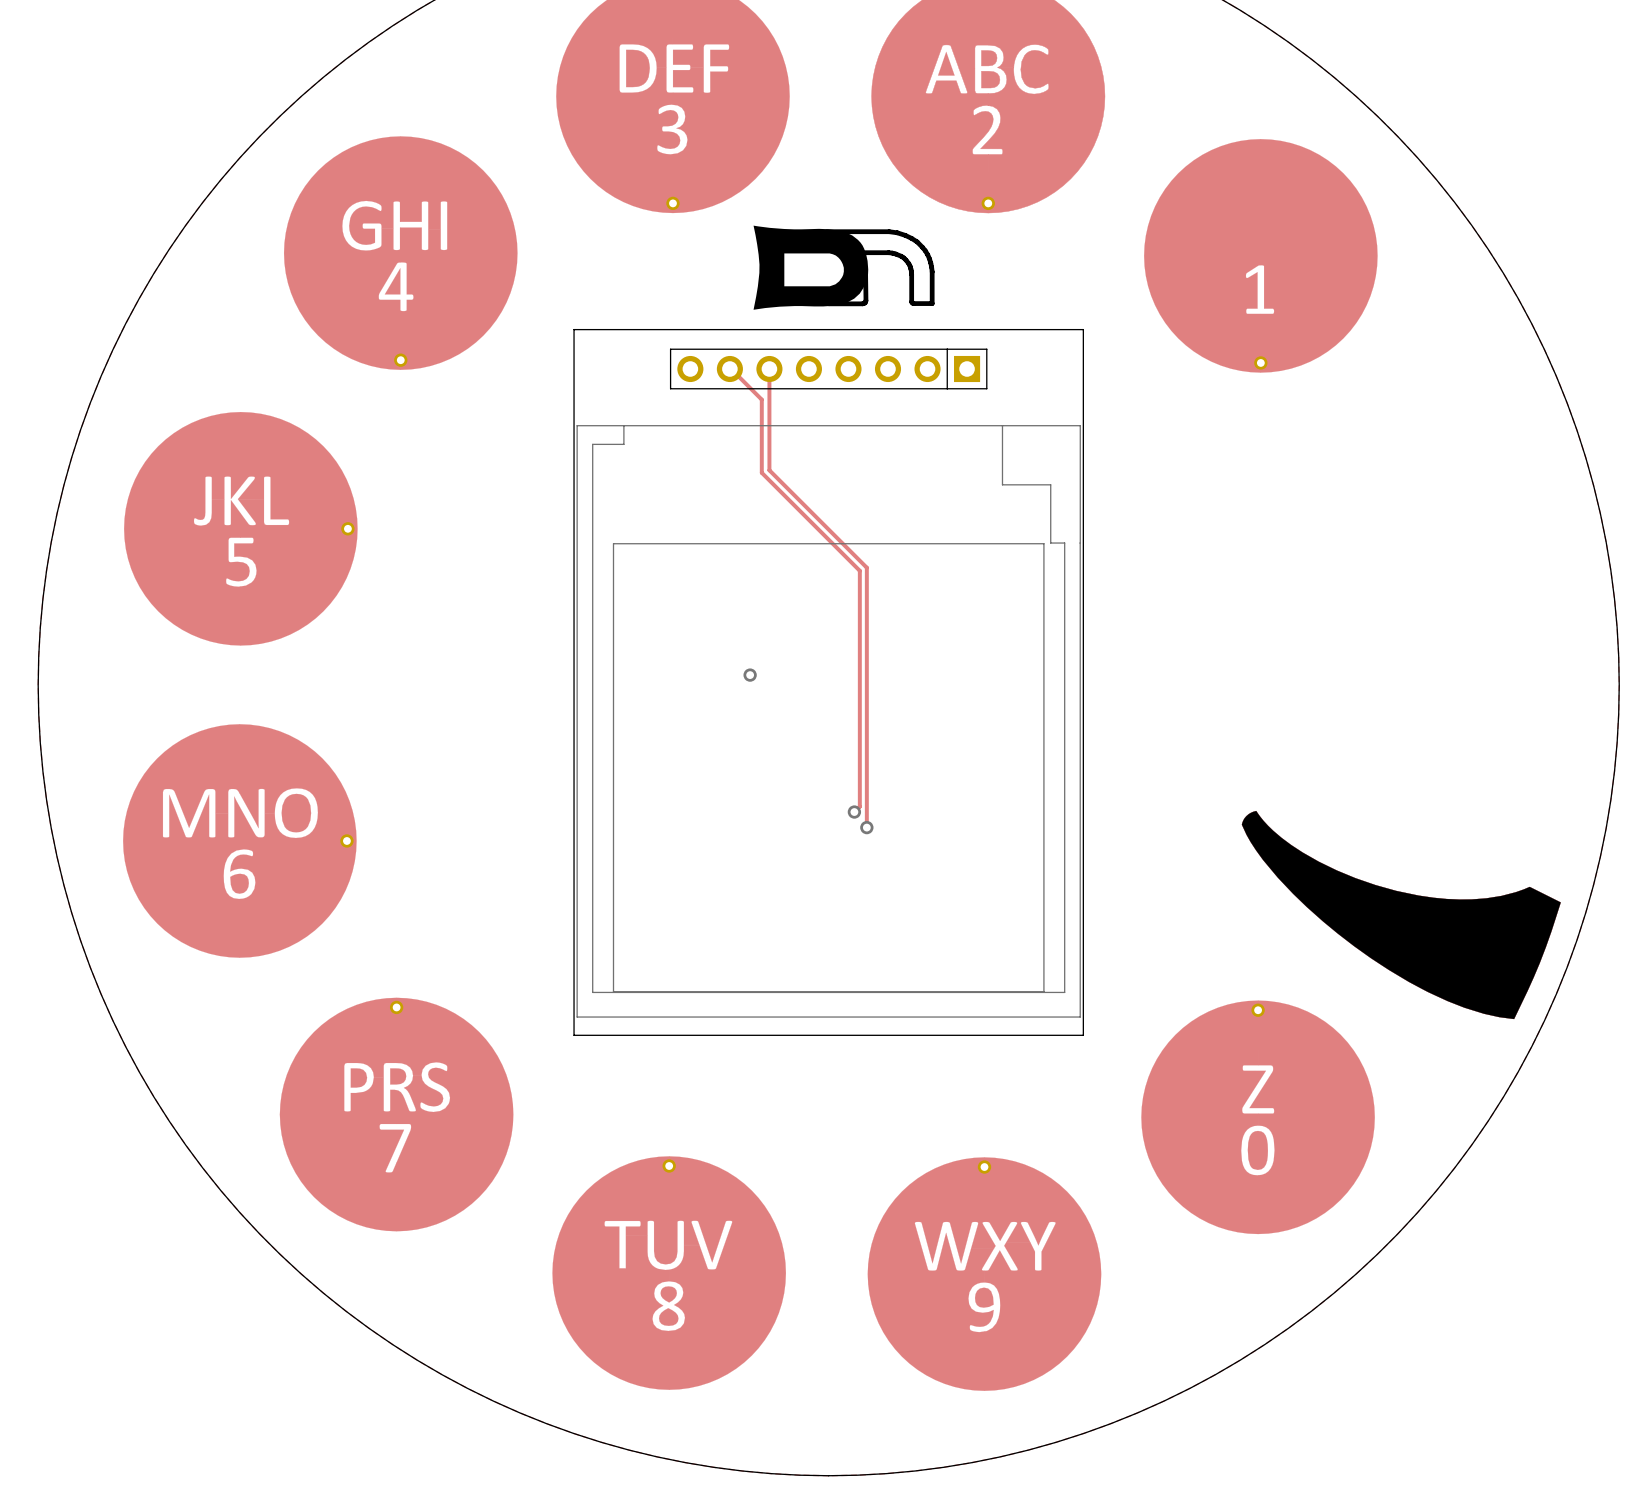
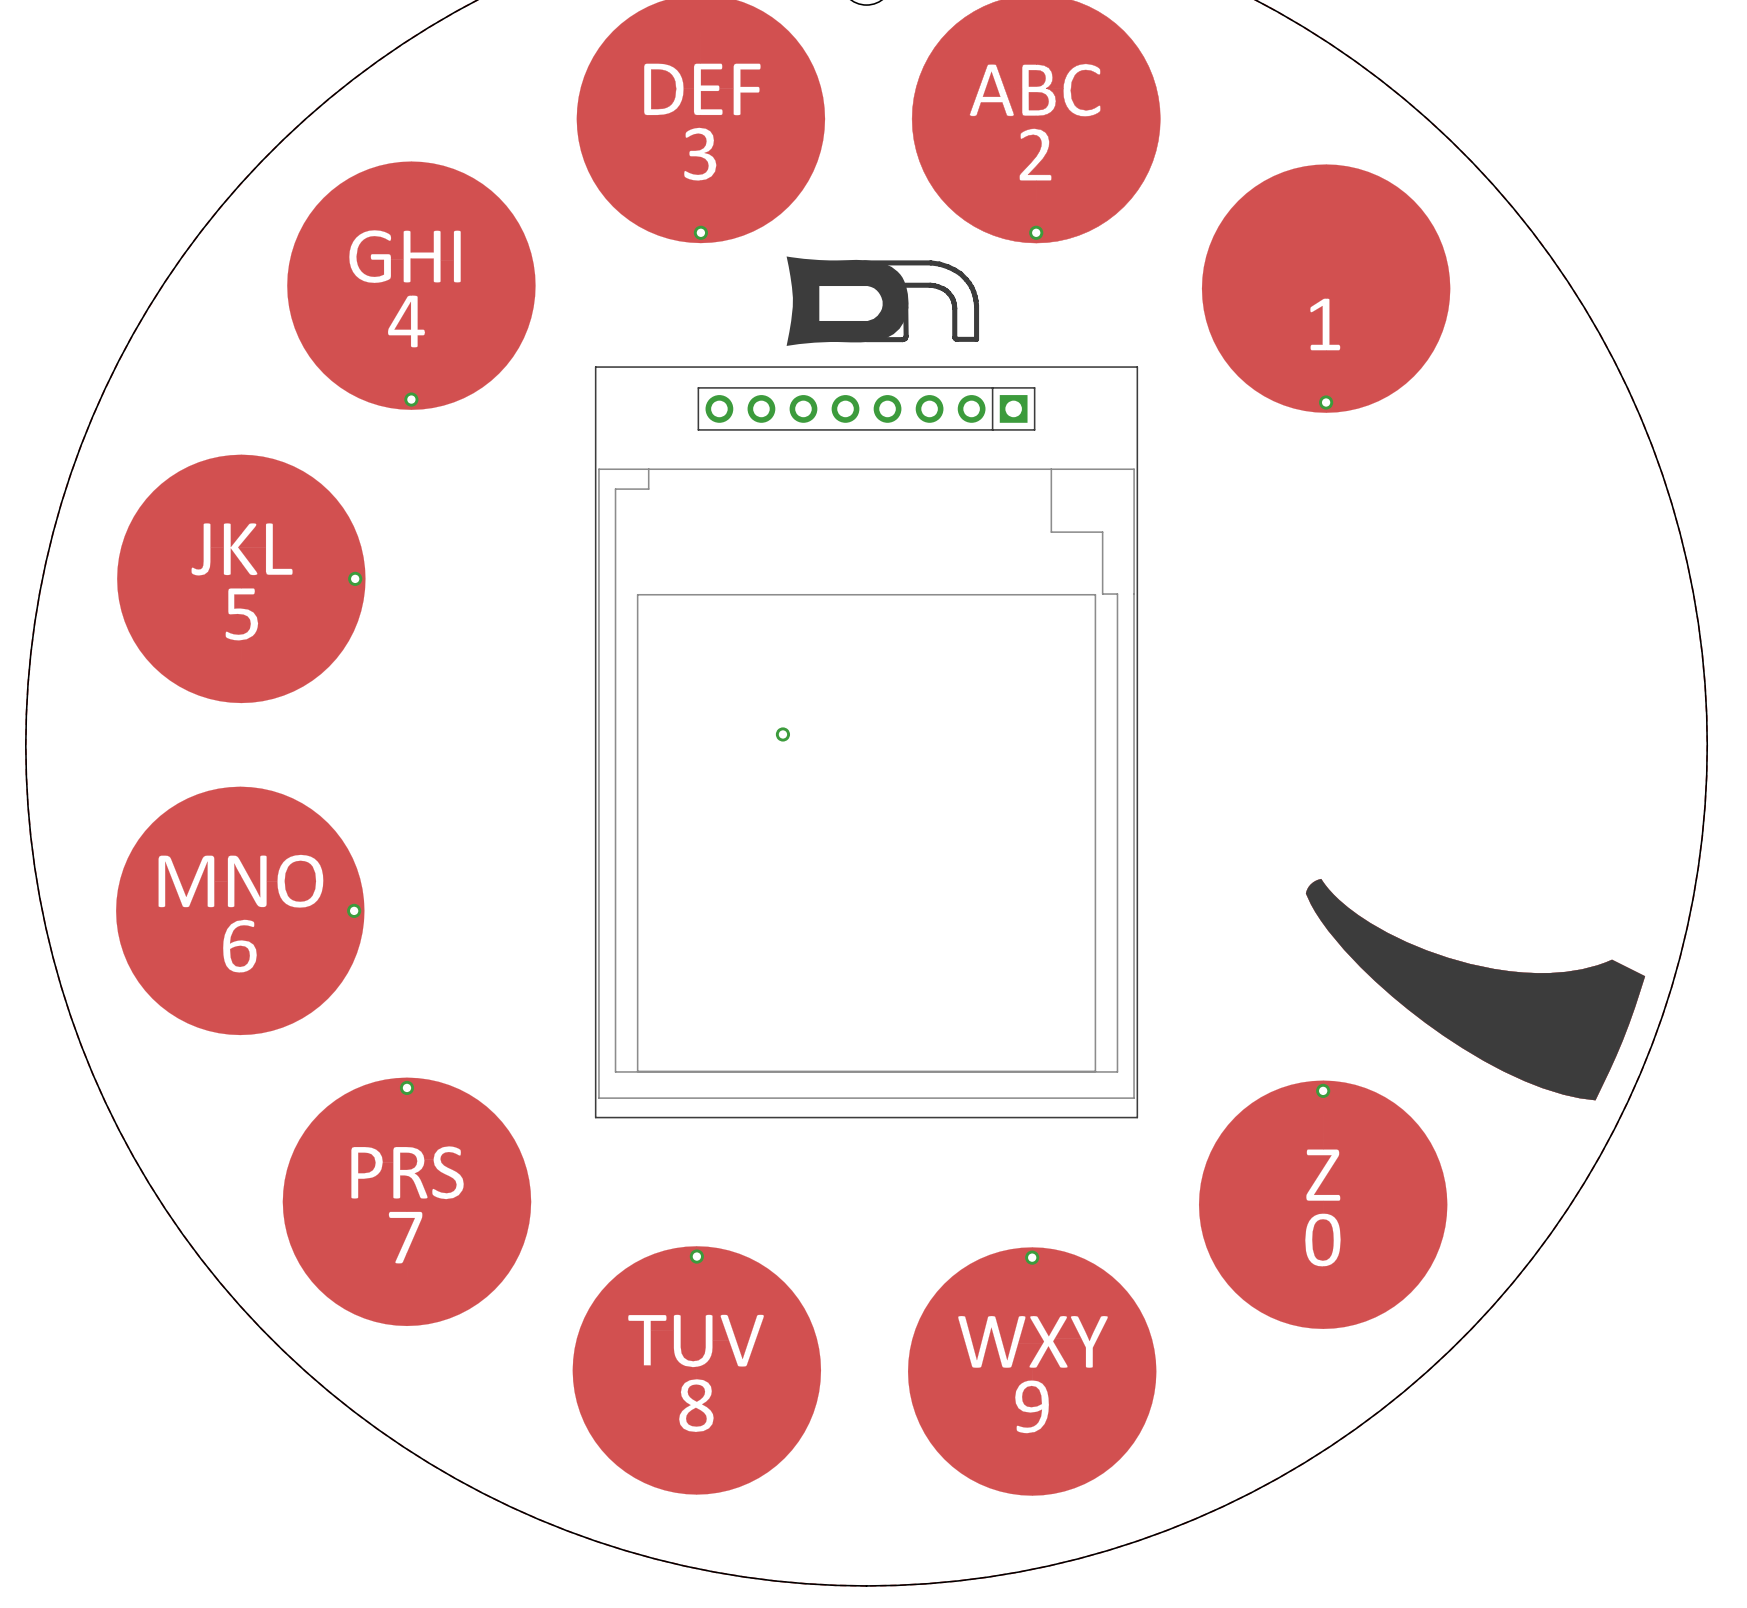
track: (729, 369) (761, 399) (761, 472) (859, 570) (859, 806) (854, 812) -> none
track: (769, 369) (769, 470) (866, 567) (866, 827) -> none
via: (854, 812) -> none
via: (866, 827) -> none

